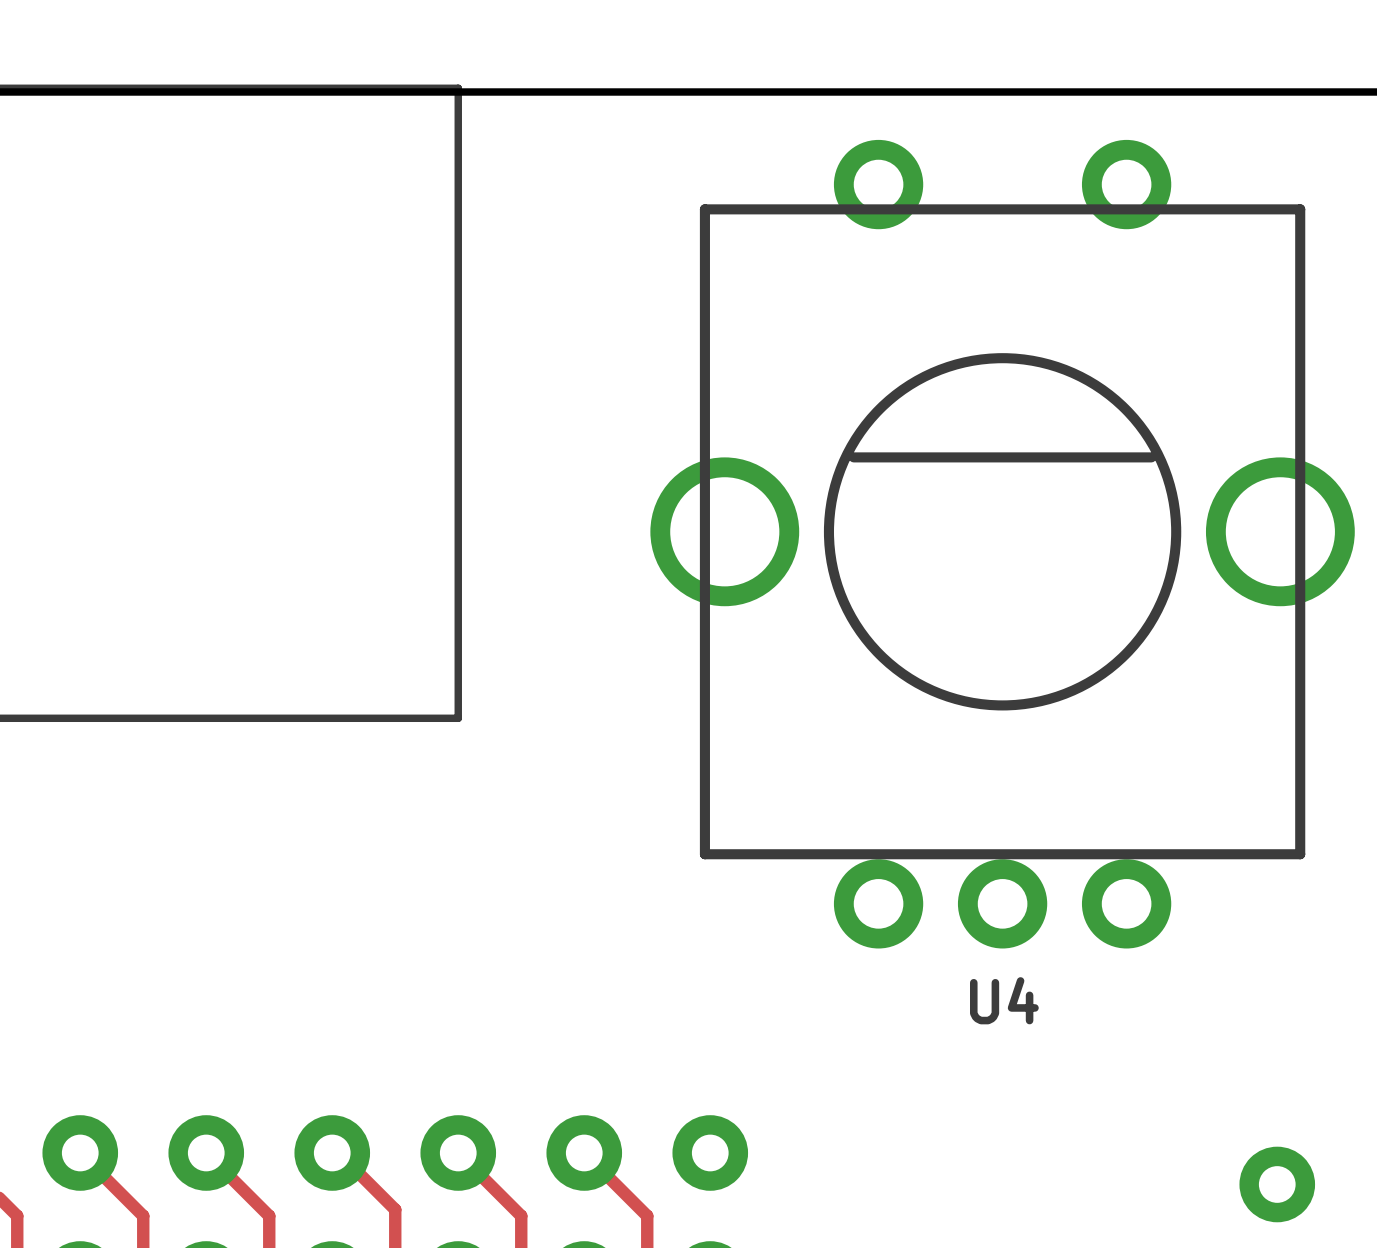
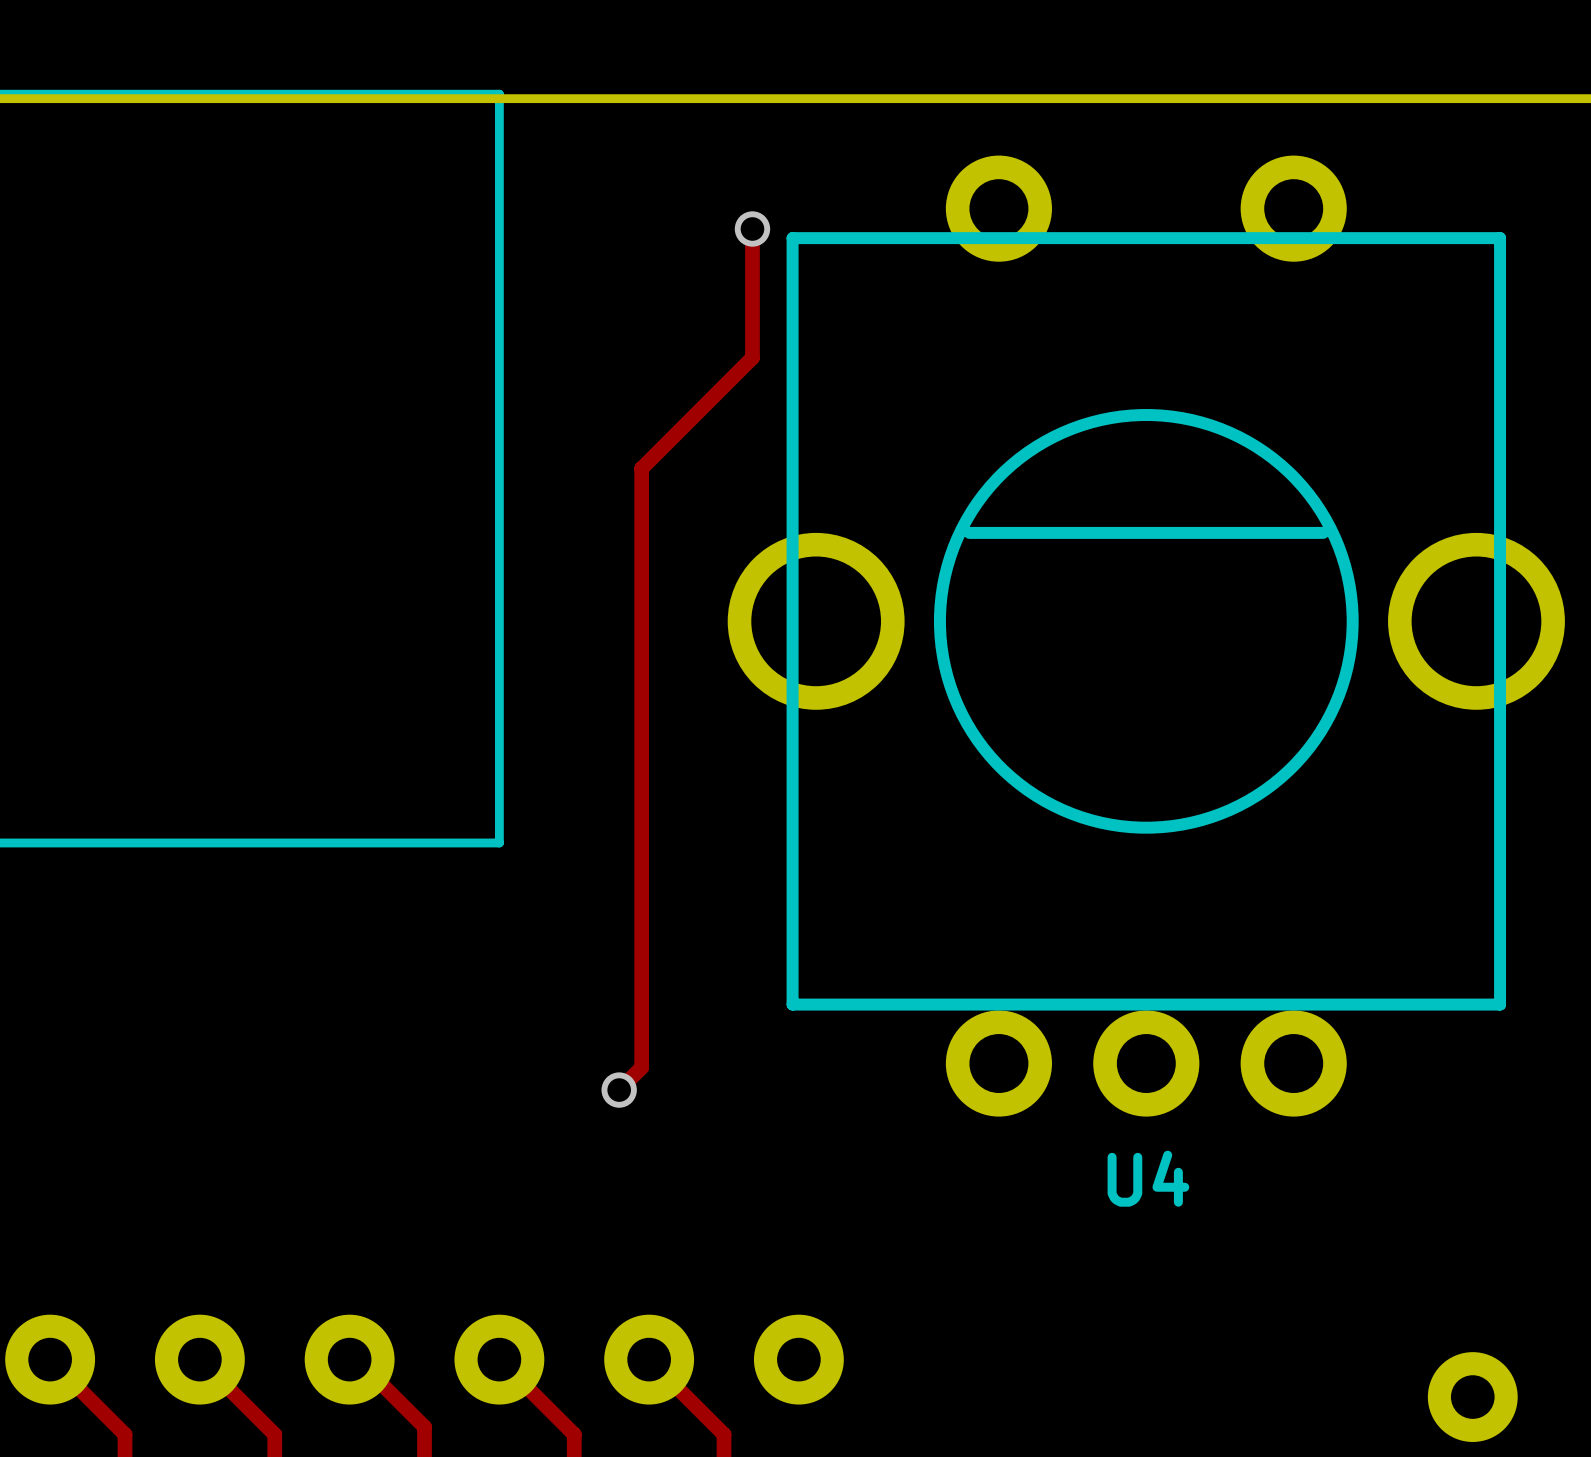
track: none -> (752, 226) (752, 357) (641, 468) (641, 1067) (619, 1090)
via: none -> (752, 228)
via: none -> (619, 1090)

